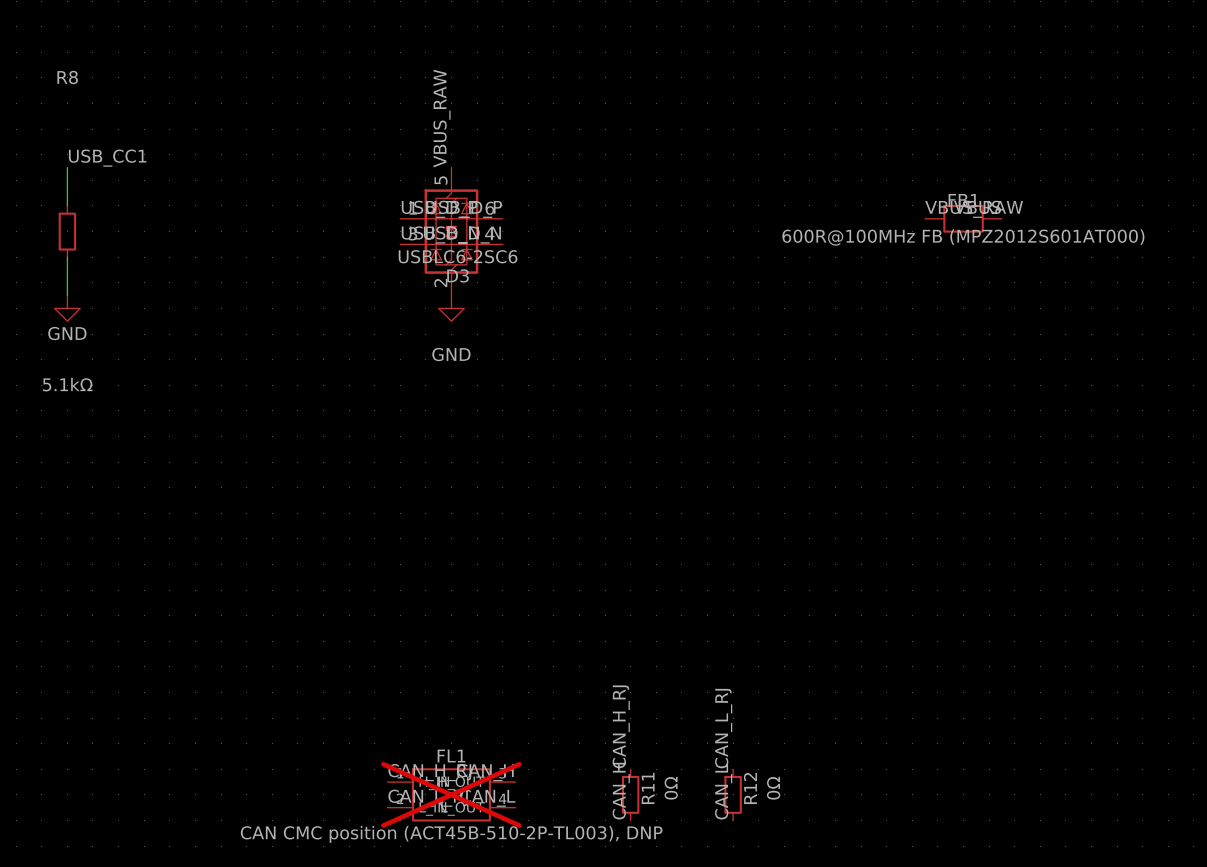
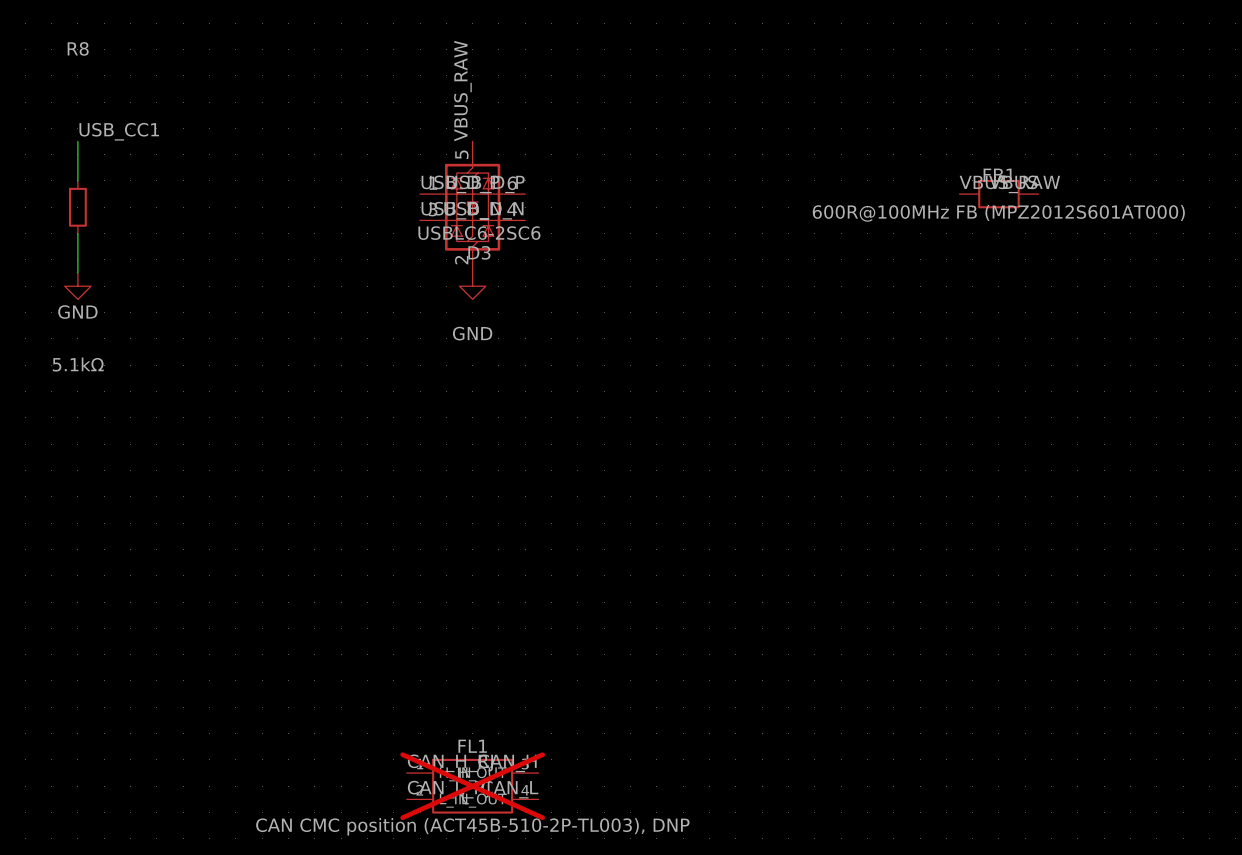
label: CAN_H_RJ (621, 726) -> none
label: CAN_L_RJ (723, 728) -> none
label: CAN_H (621, 791) -> none
label: CAN_L (723, 792) -> none
R11: 0Ω (630, 794) -> none
R12: 0Ω (733, 794) -> none

